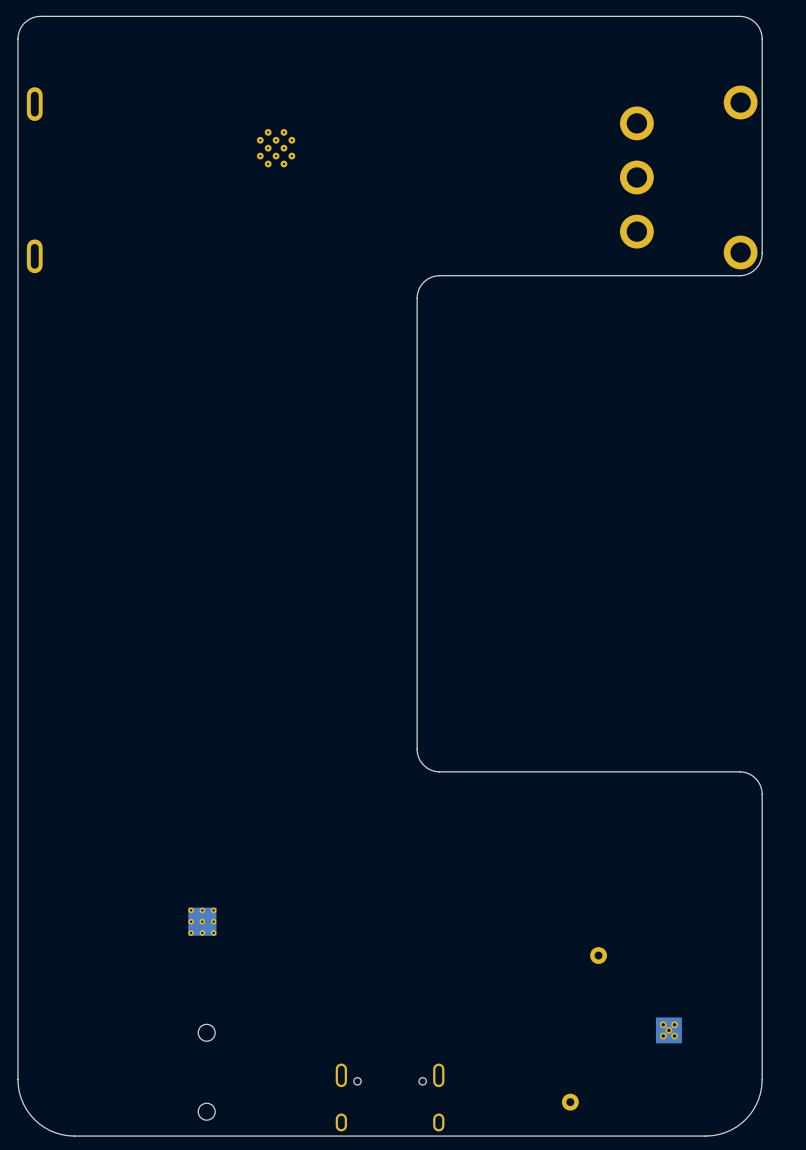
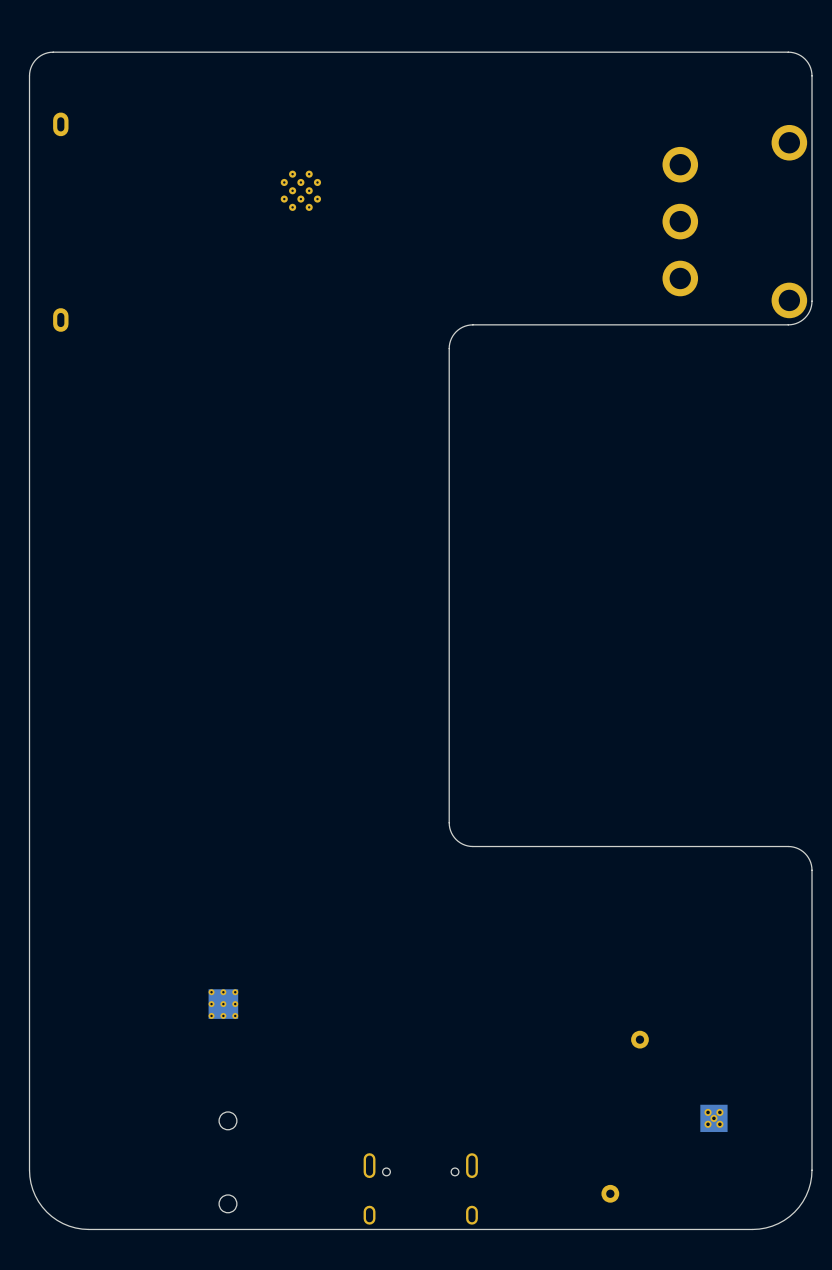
part: none -> (60, 124)
part: (34, 104) -> none
part: (34, 256) -> none
part: none -> (60, 319)

